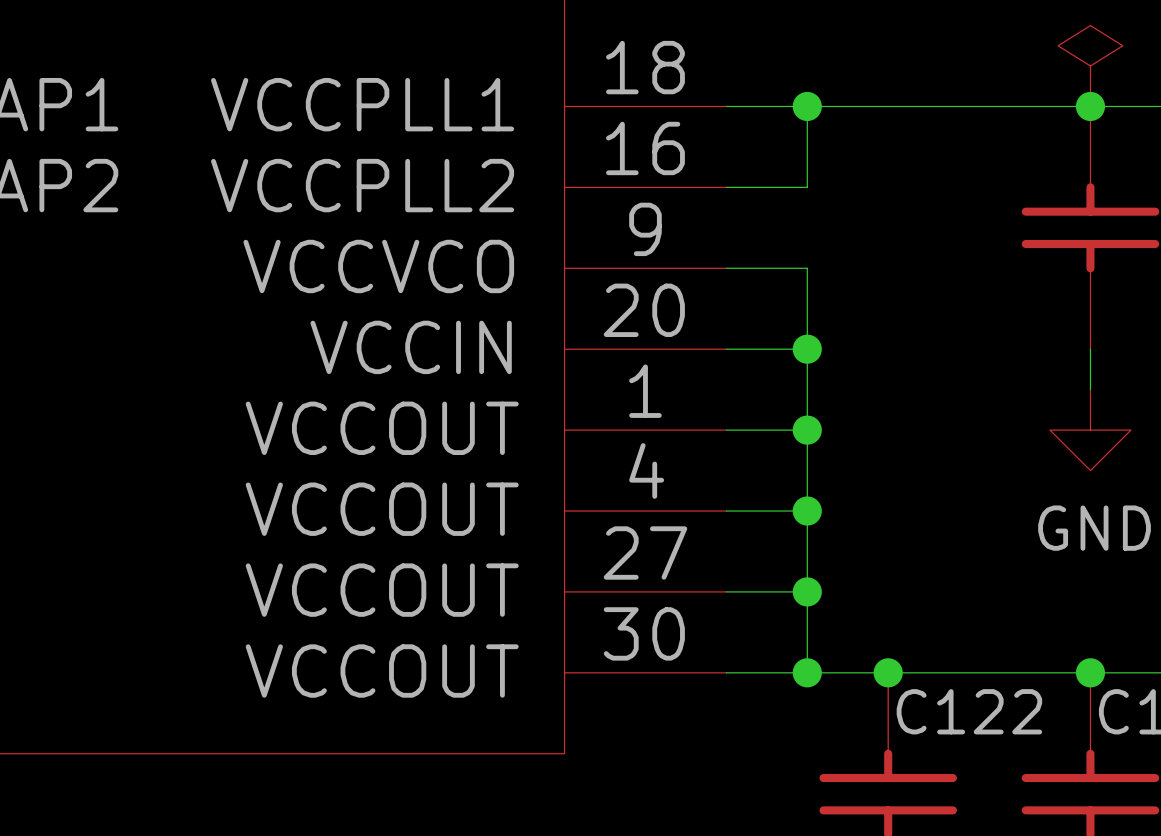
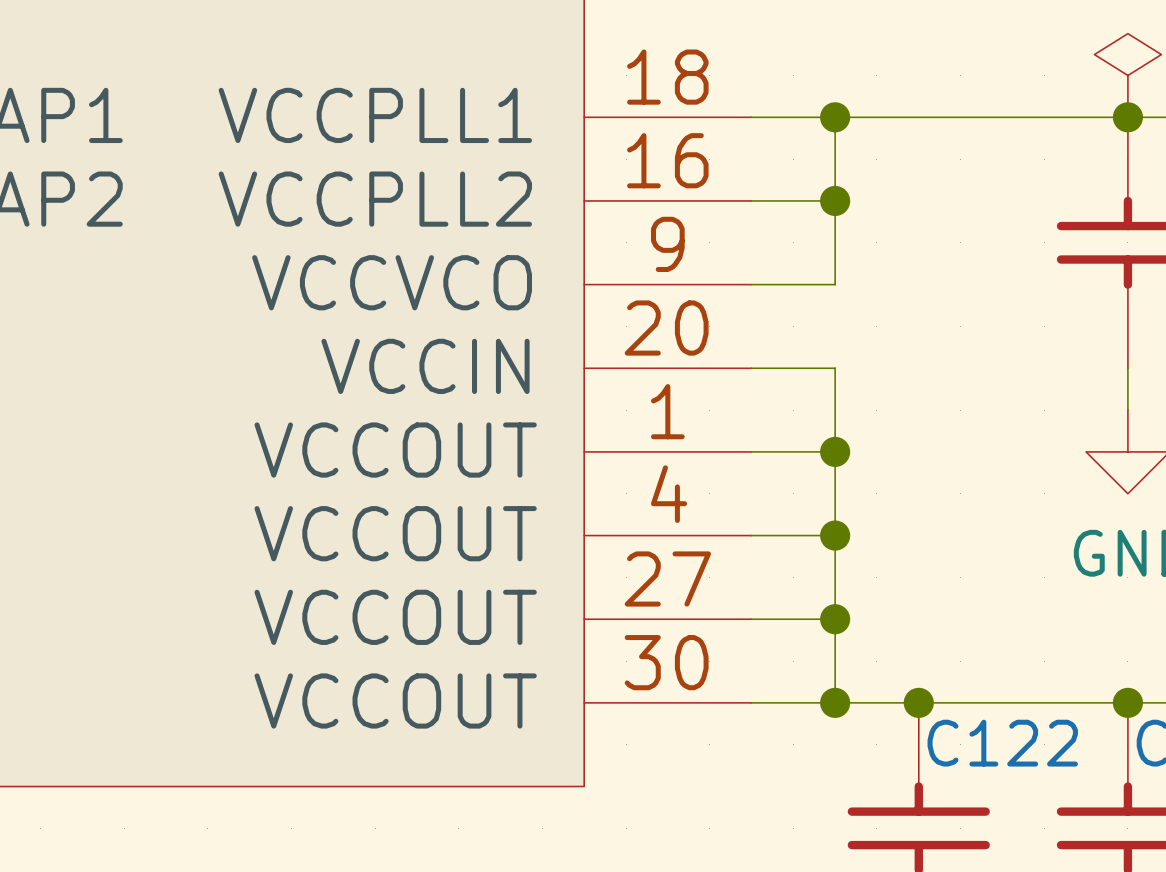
wire: (807, 268) (807, 349) -> (835, 284) (835, 200)
junction position: (807, 349) -> (835, 200)

